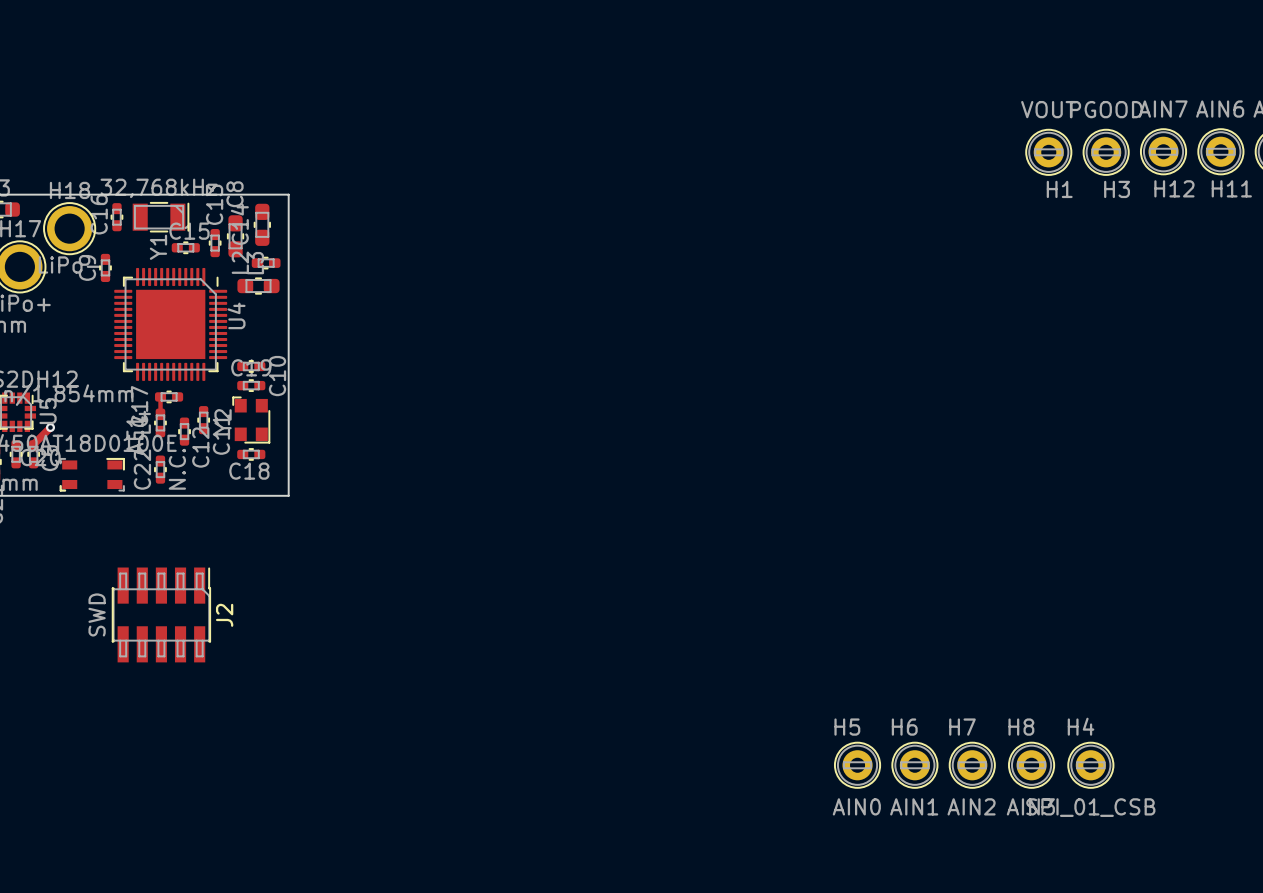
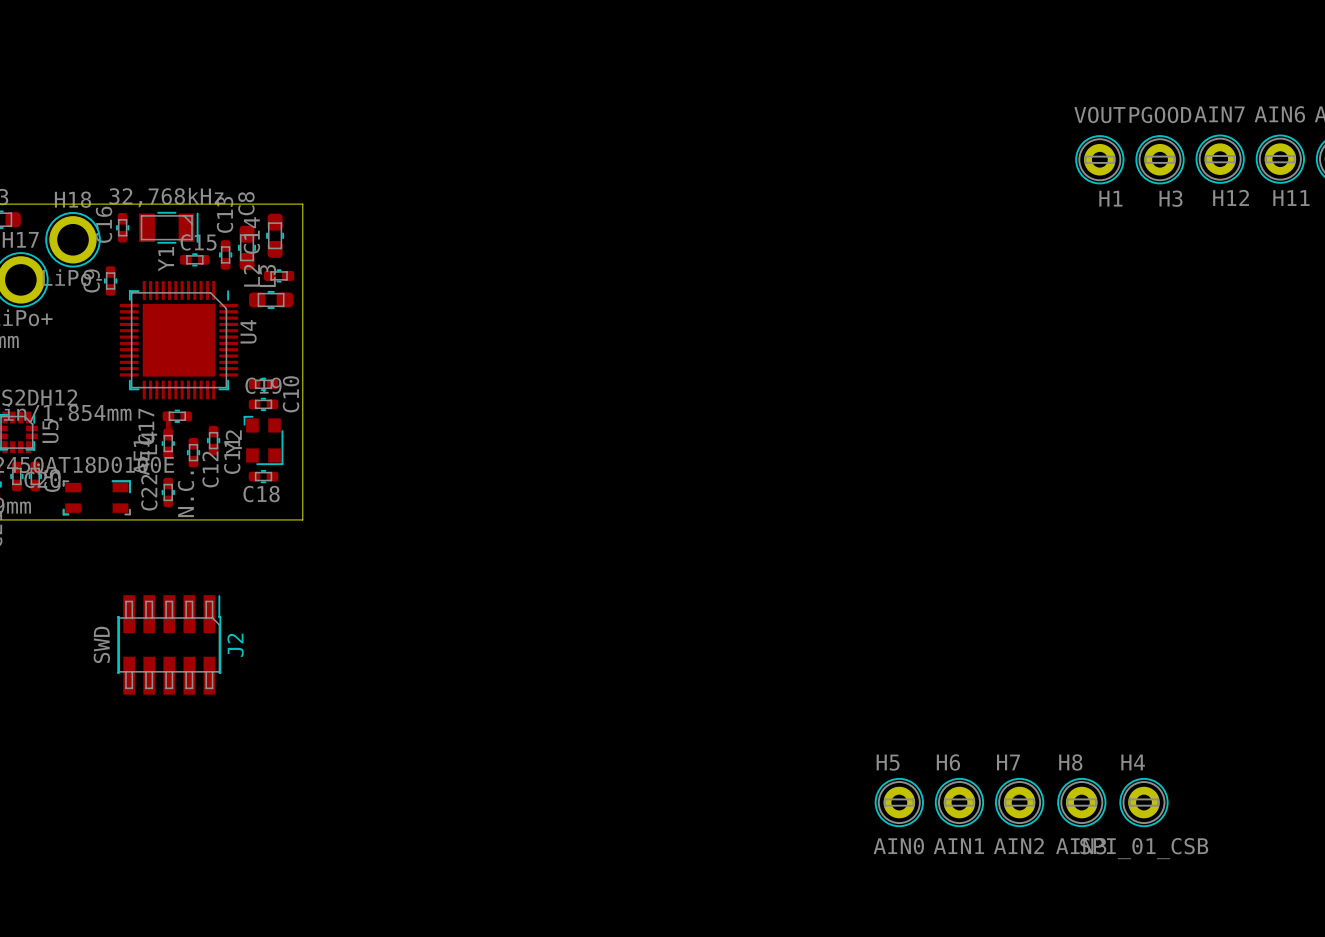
top track: (50, 427) (33, 445) -> none
via: (50, 427) -> none

